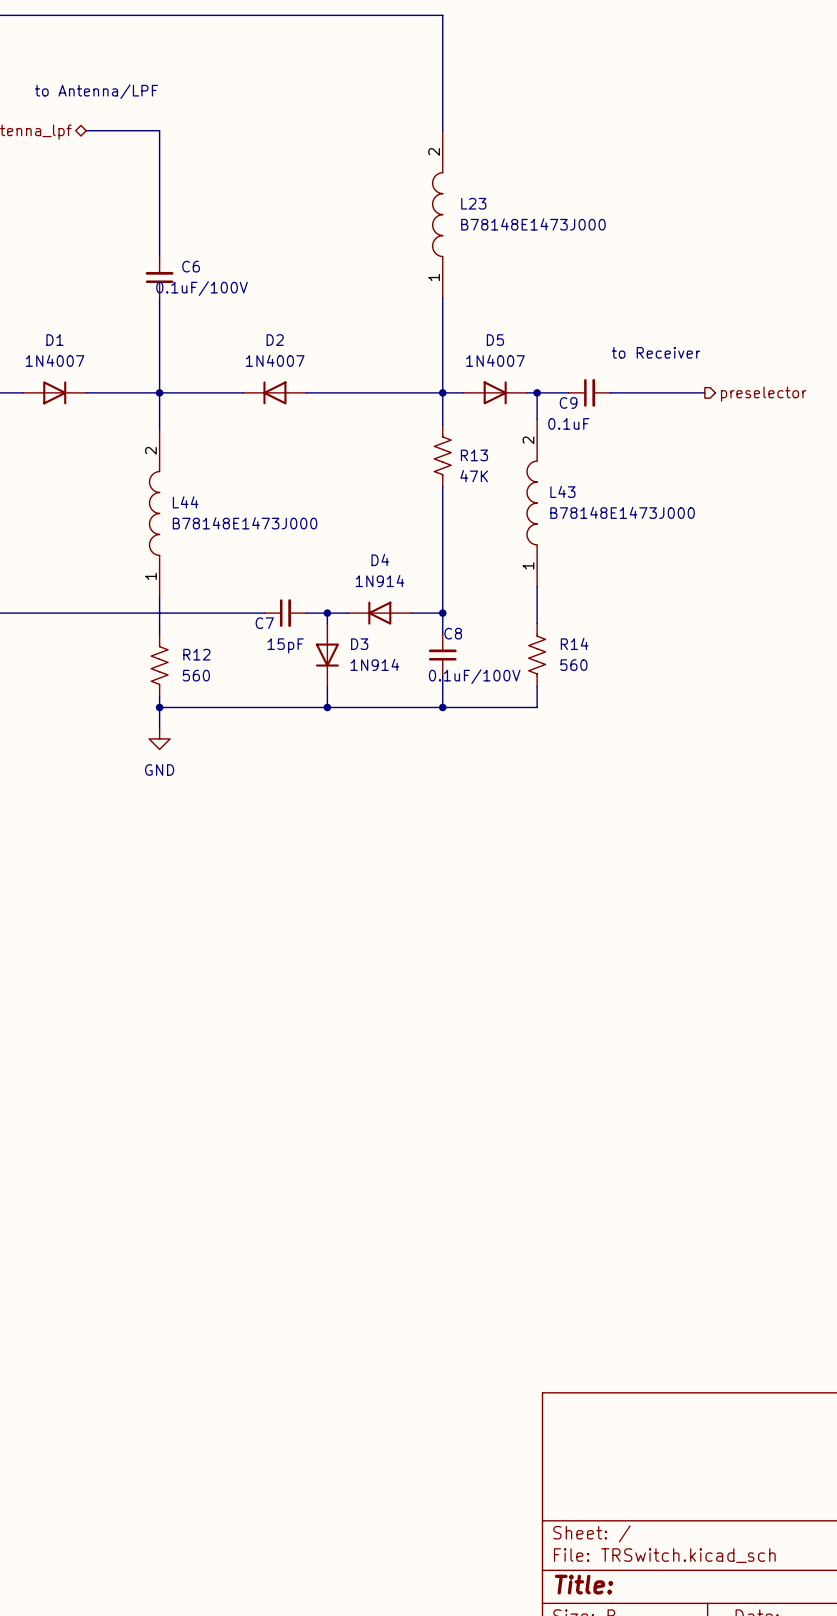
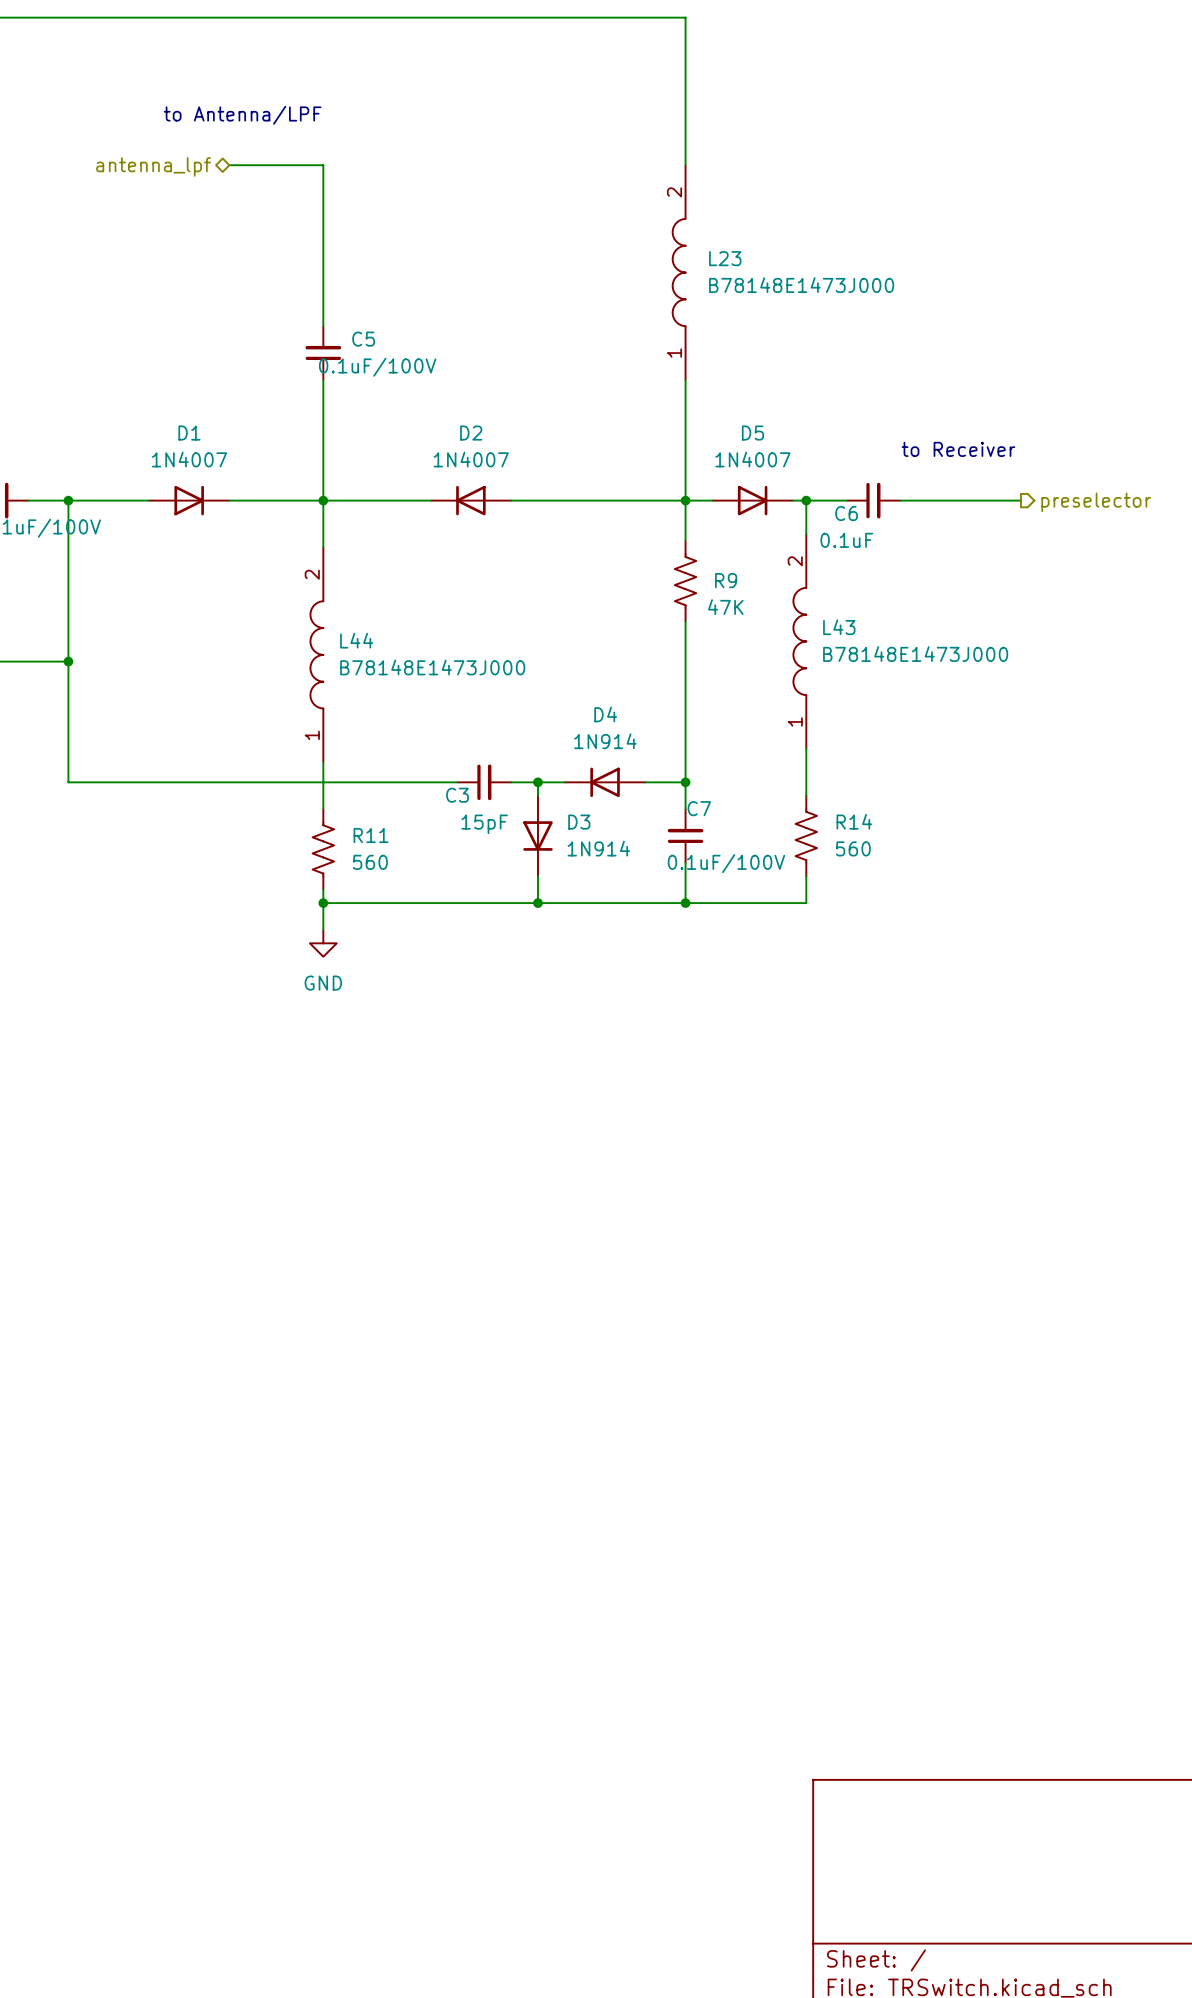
C6 name: C6 (191, 266) -> C5 (363, 339)
C9 name: C9 (568, 402) -> C6 (846, 513)
R13 name: R13 (474, 455) -> R9 (726, 580)
C7 name: C7 (264, 623) -> C3 (457, 795)
C8 name: C8 (453, 633) -> C7 (699, 808)
R12 name: R12 (196, 654) -> R11 (371, 835)

